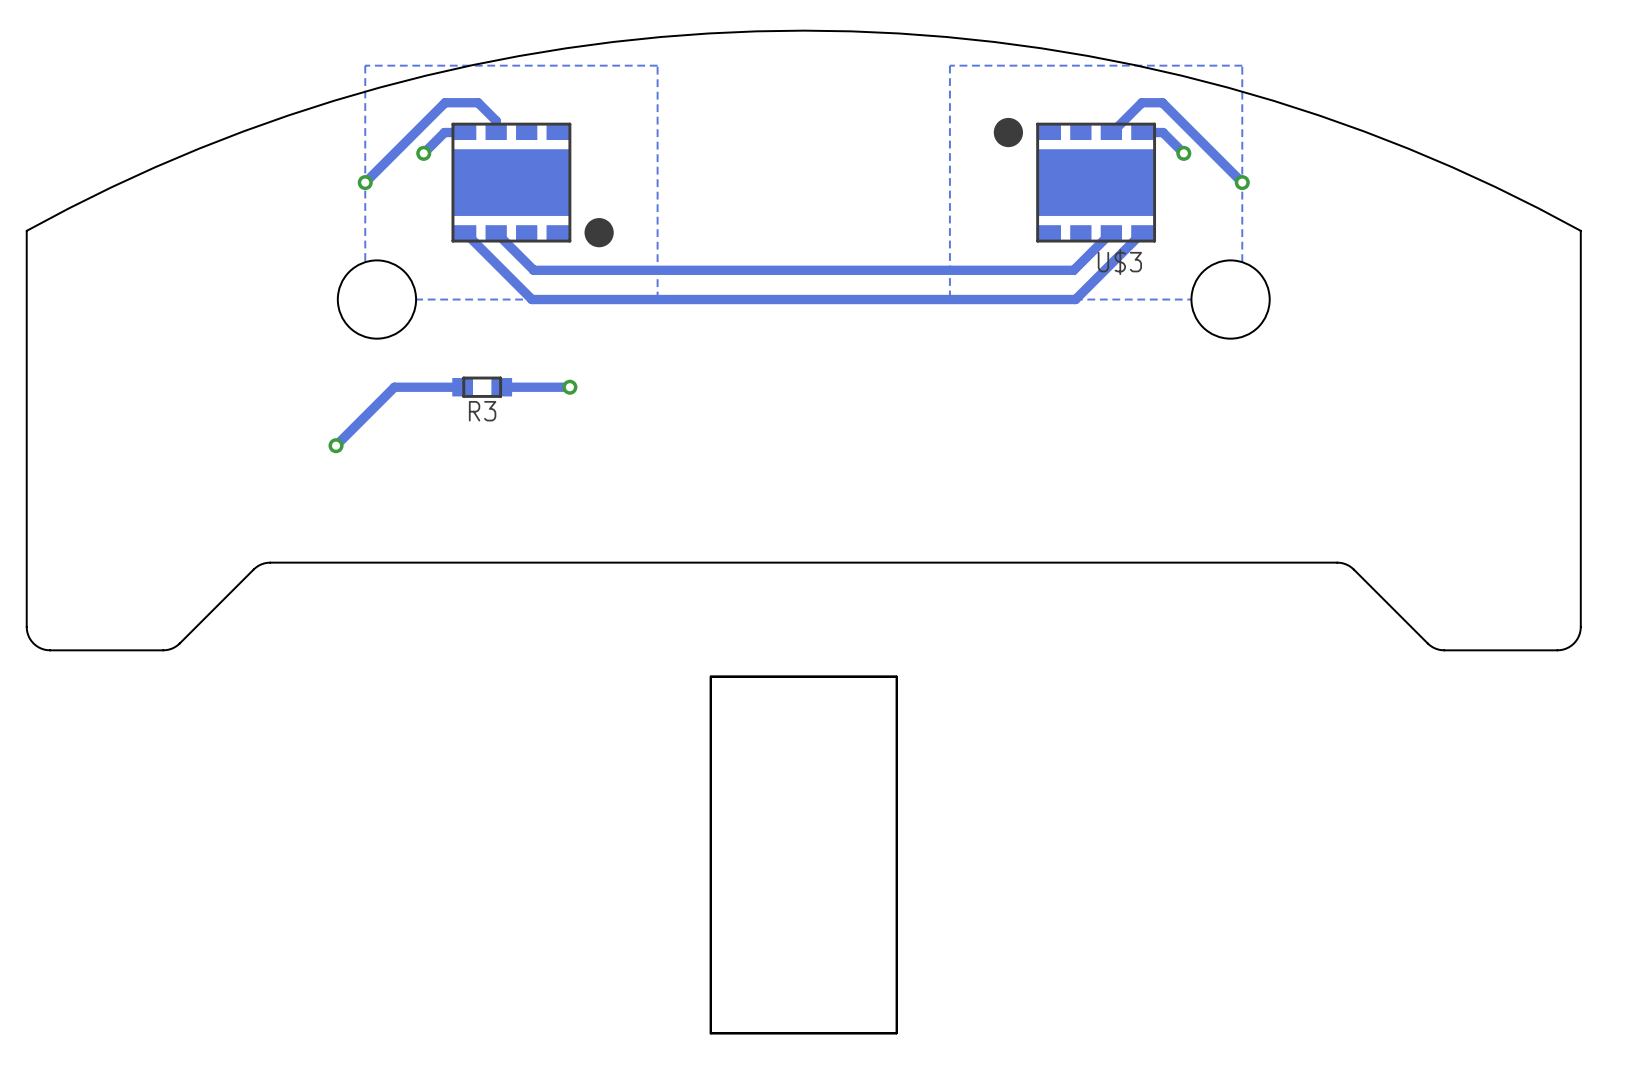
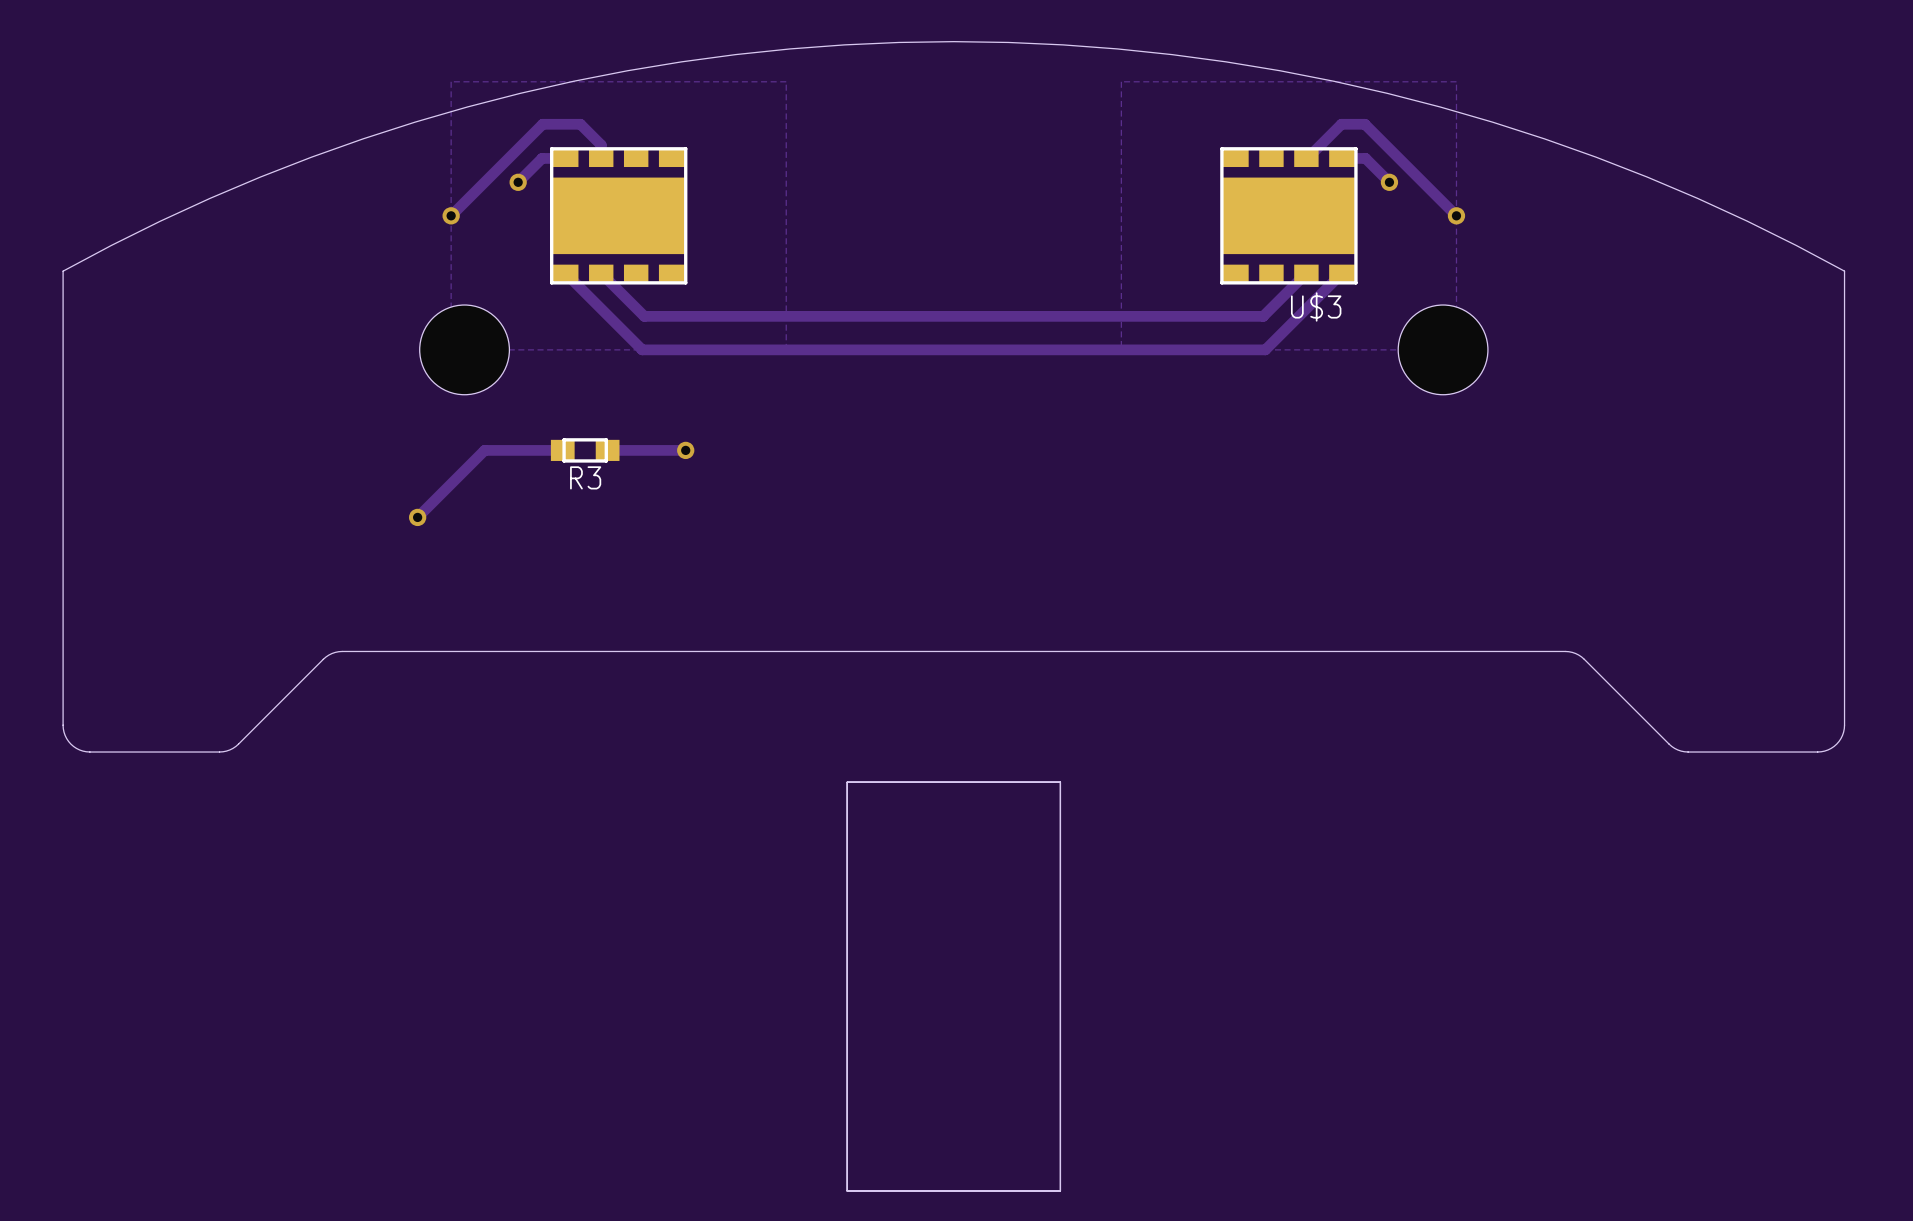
U$3 footprint: [993, 117, 1157, 243] -> [1220, 147, 1358, 285]
part footprint: [451, 122, 614, 248] -> [550, 147, 688, 285]

